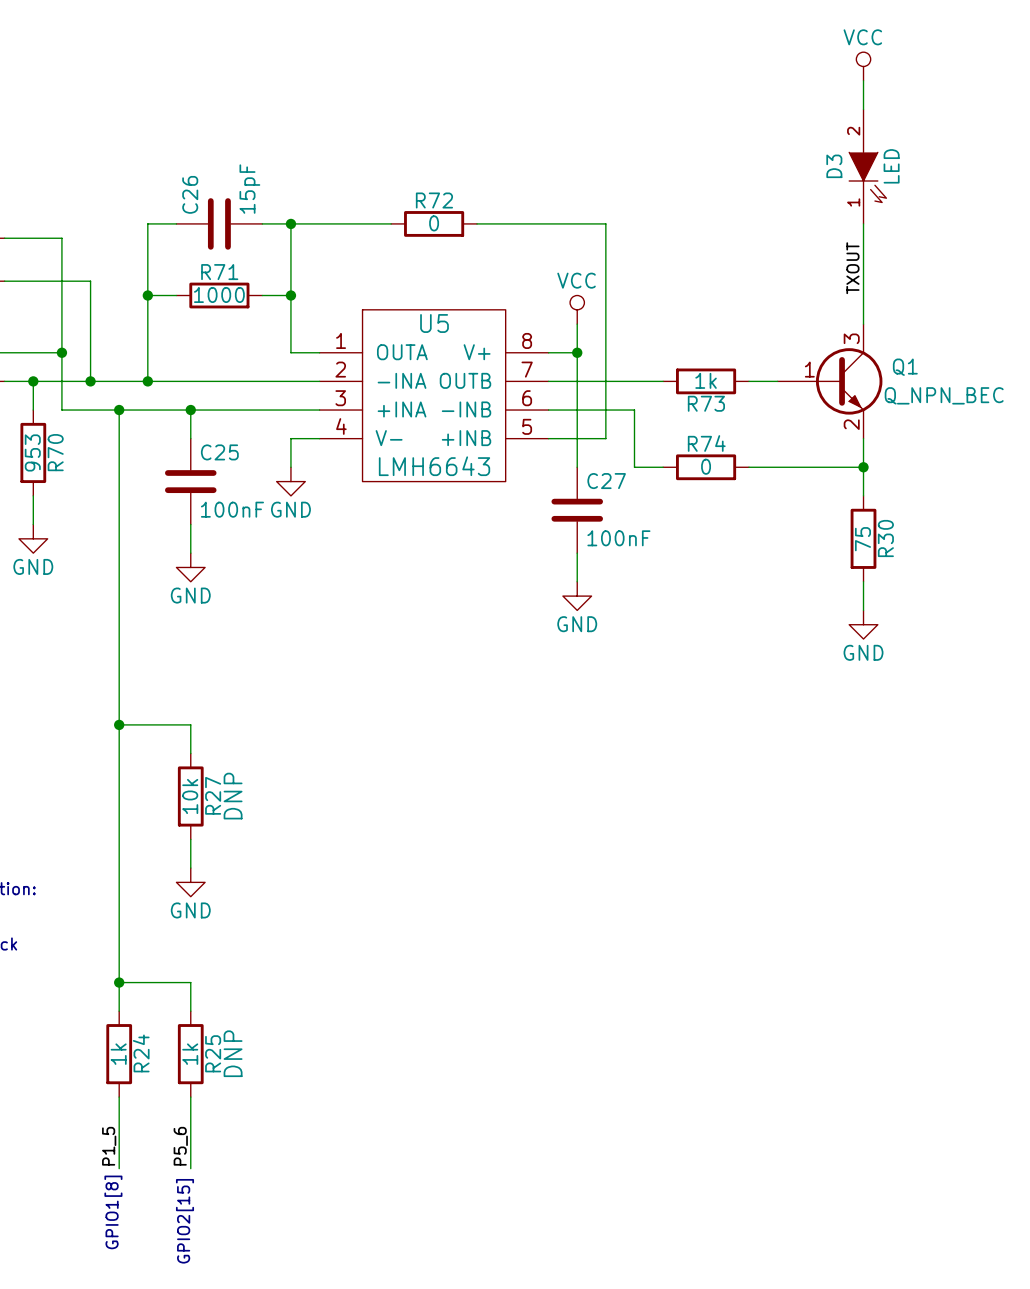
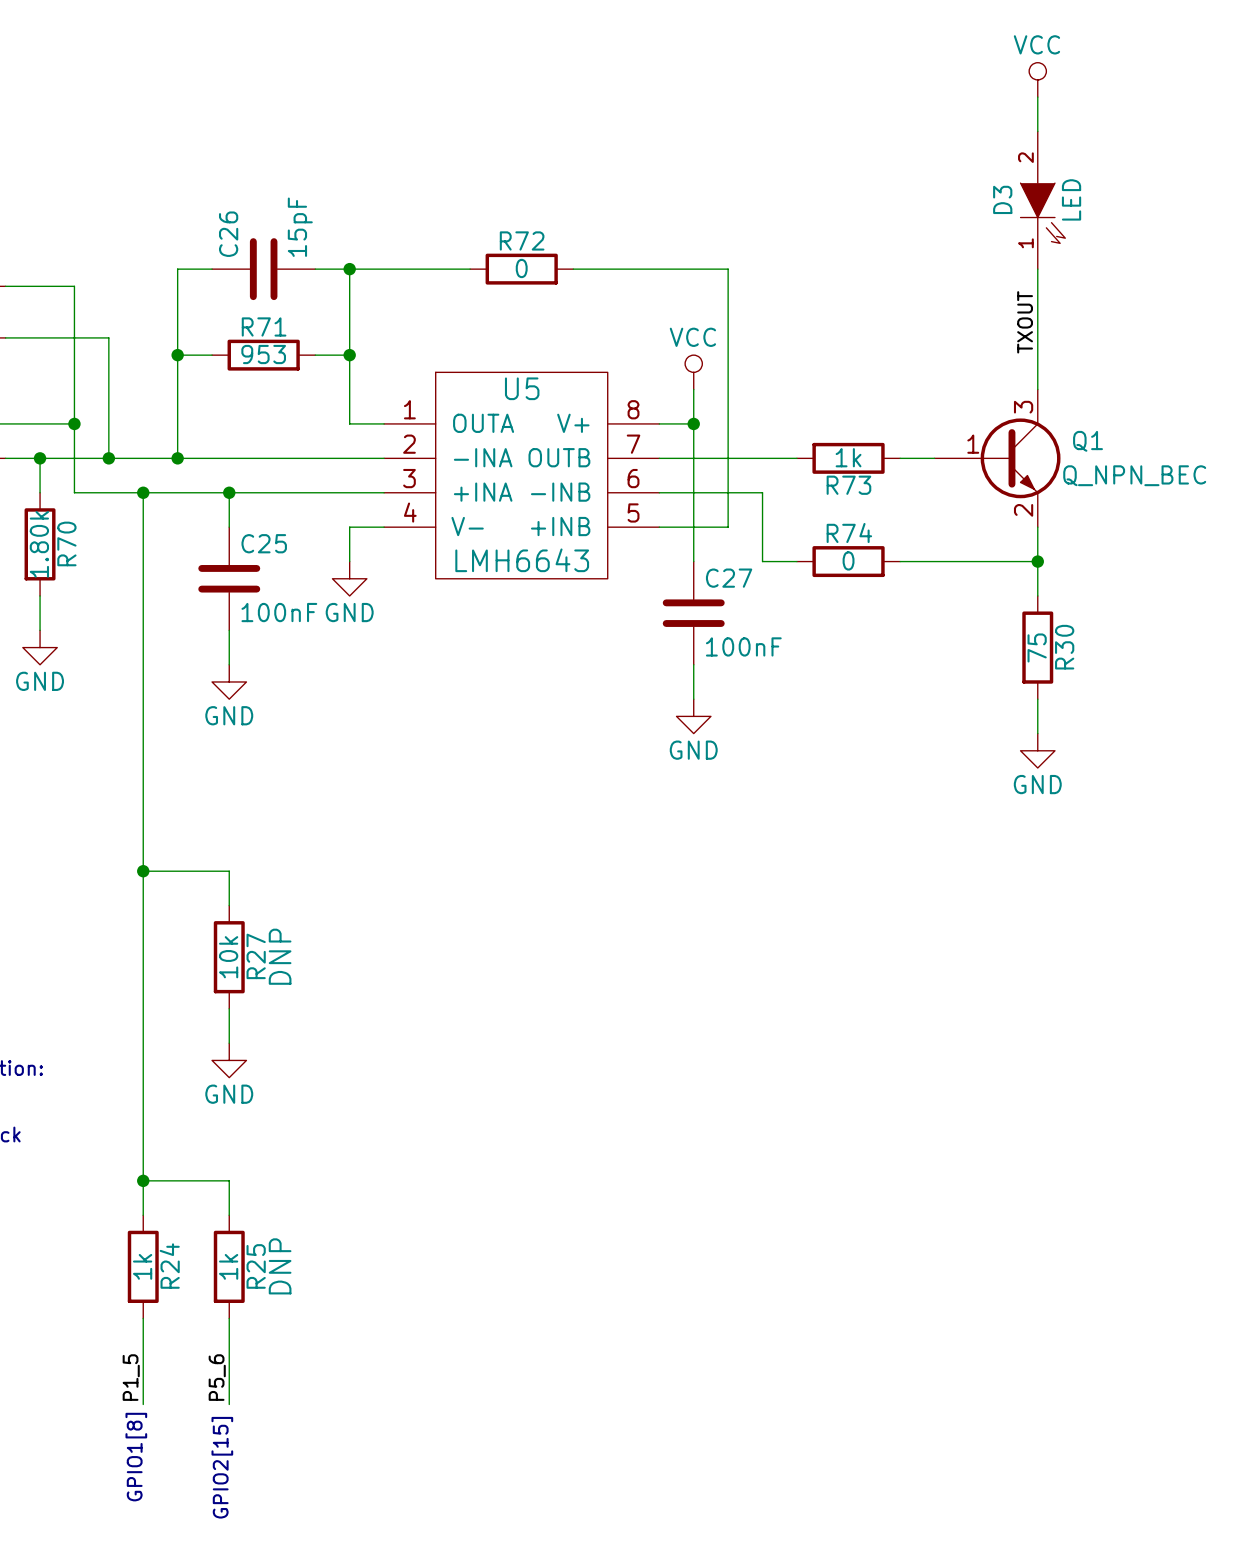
R71 value: 1000 (219, 294) -> 953 (263, 354)
R70 value: 953 (32, 452) -> 1.80k (39, 544)

